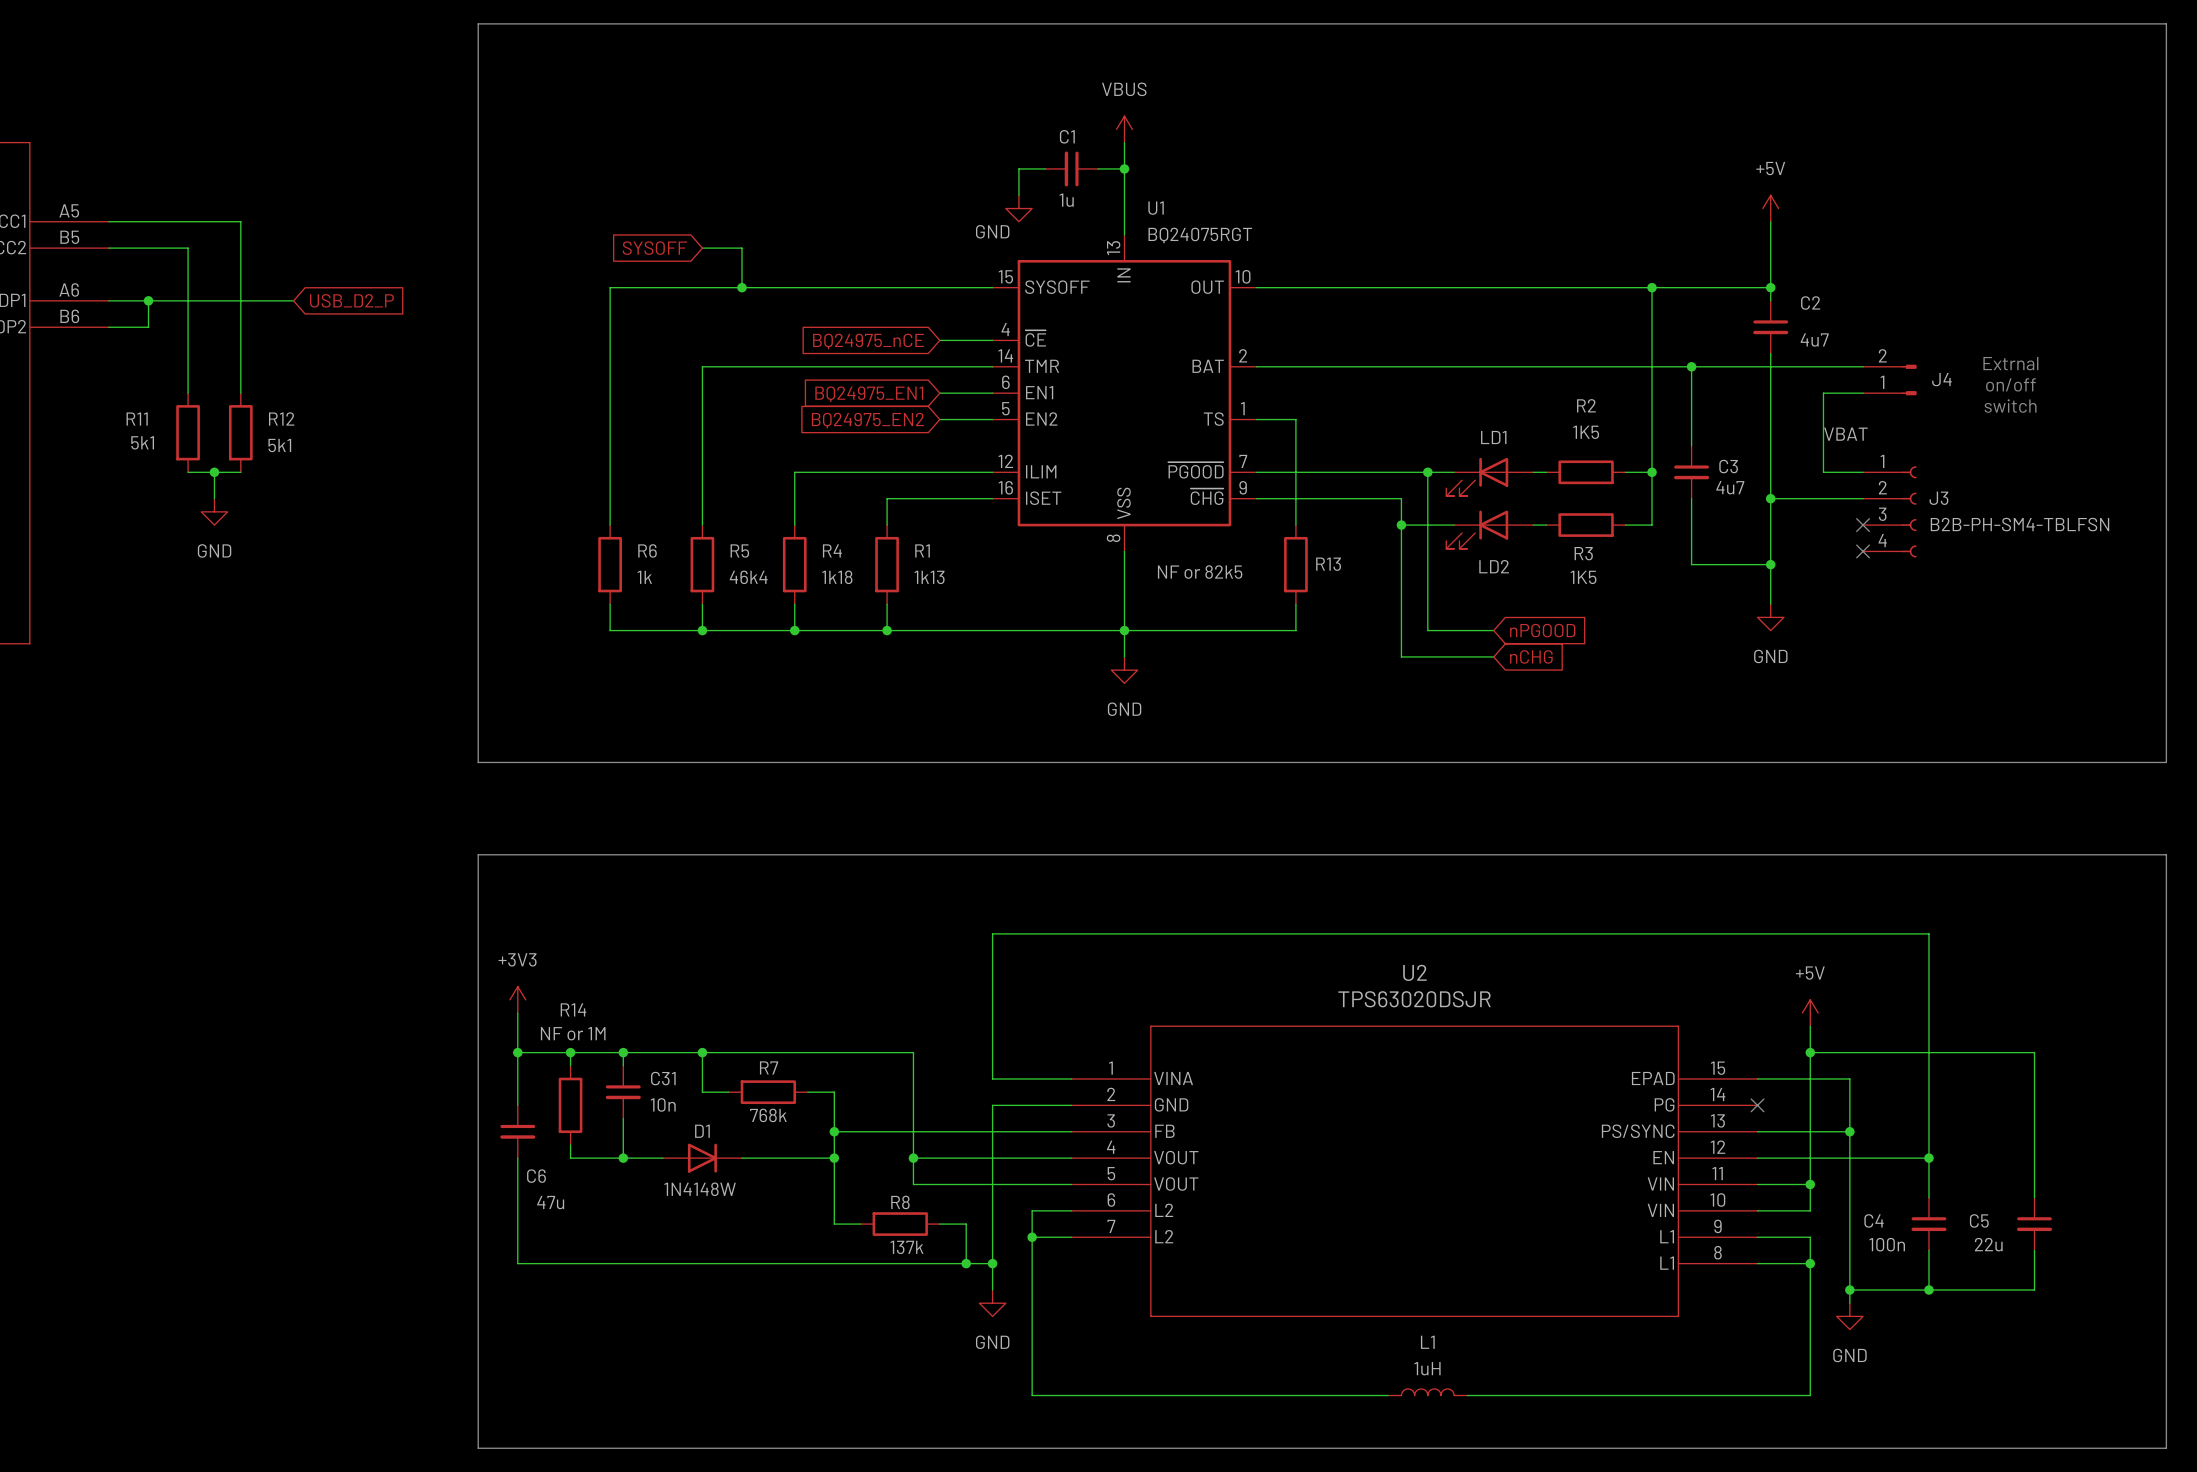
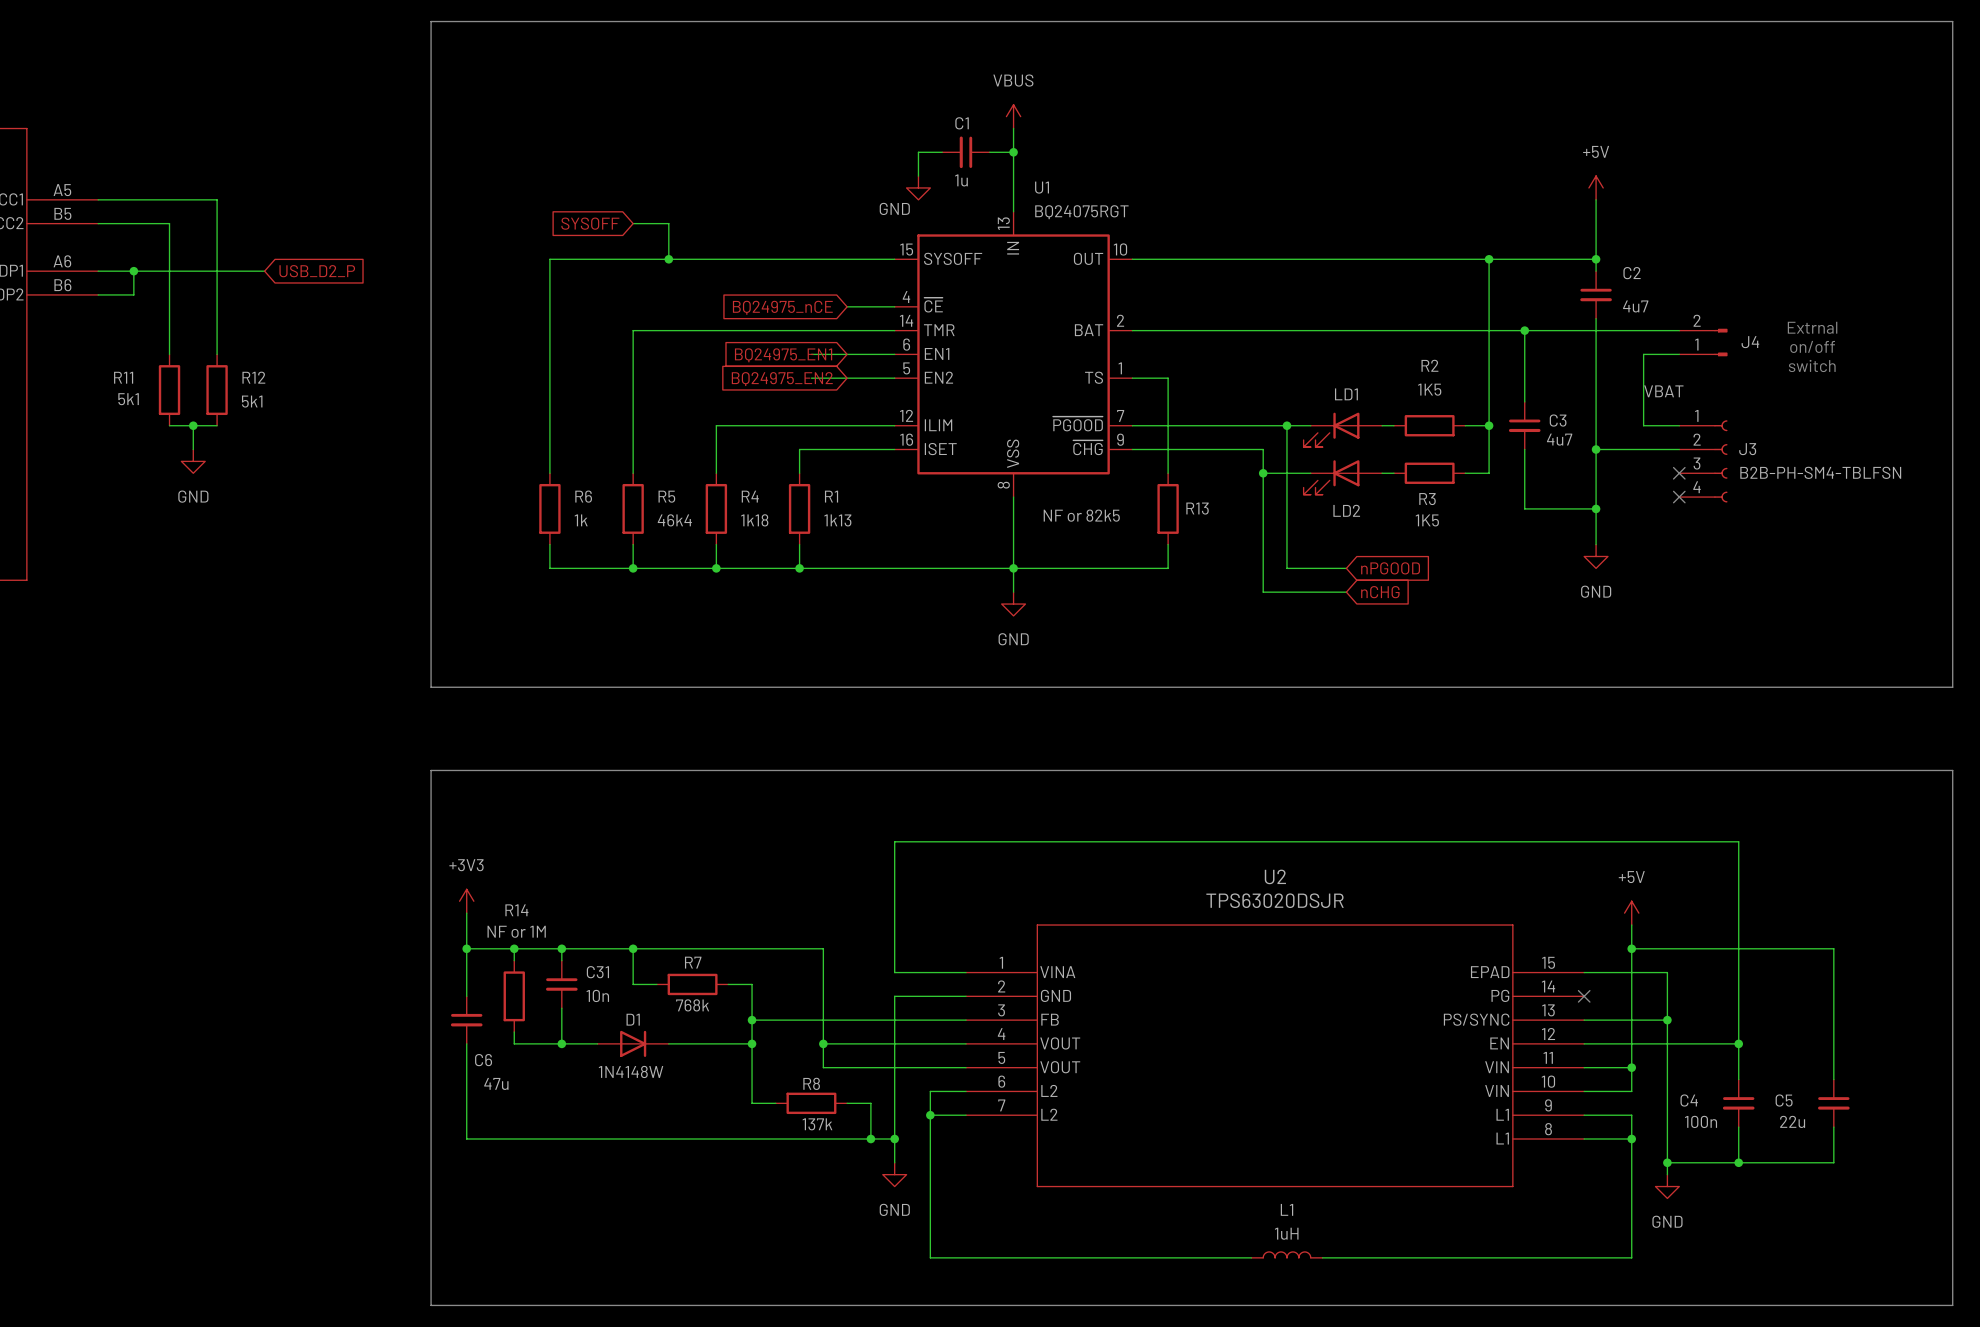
wire: none -> (811, 354) (847, 354)
wire: none -> (811, 378) (847, 378)

